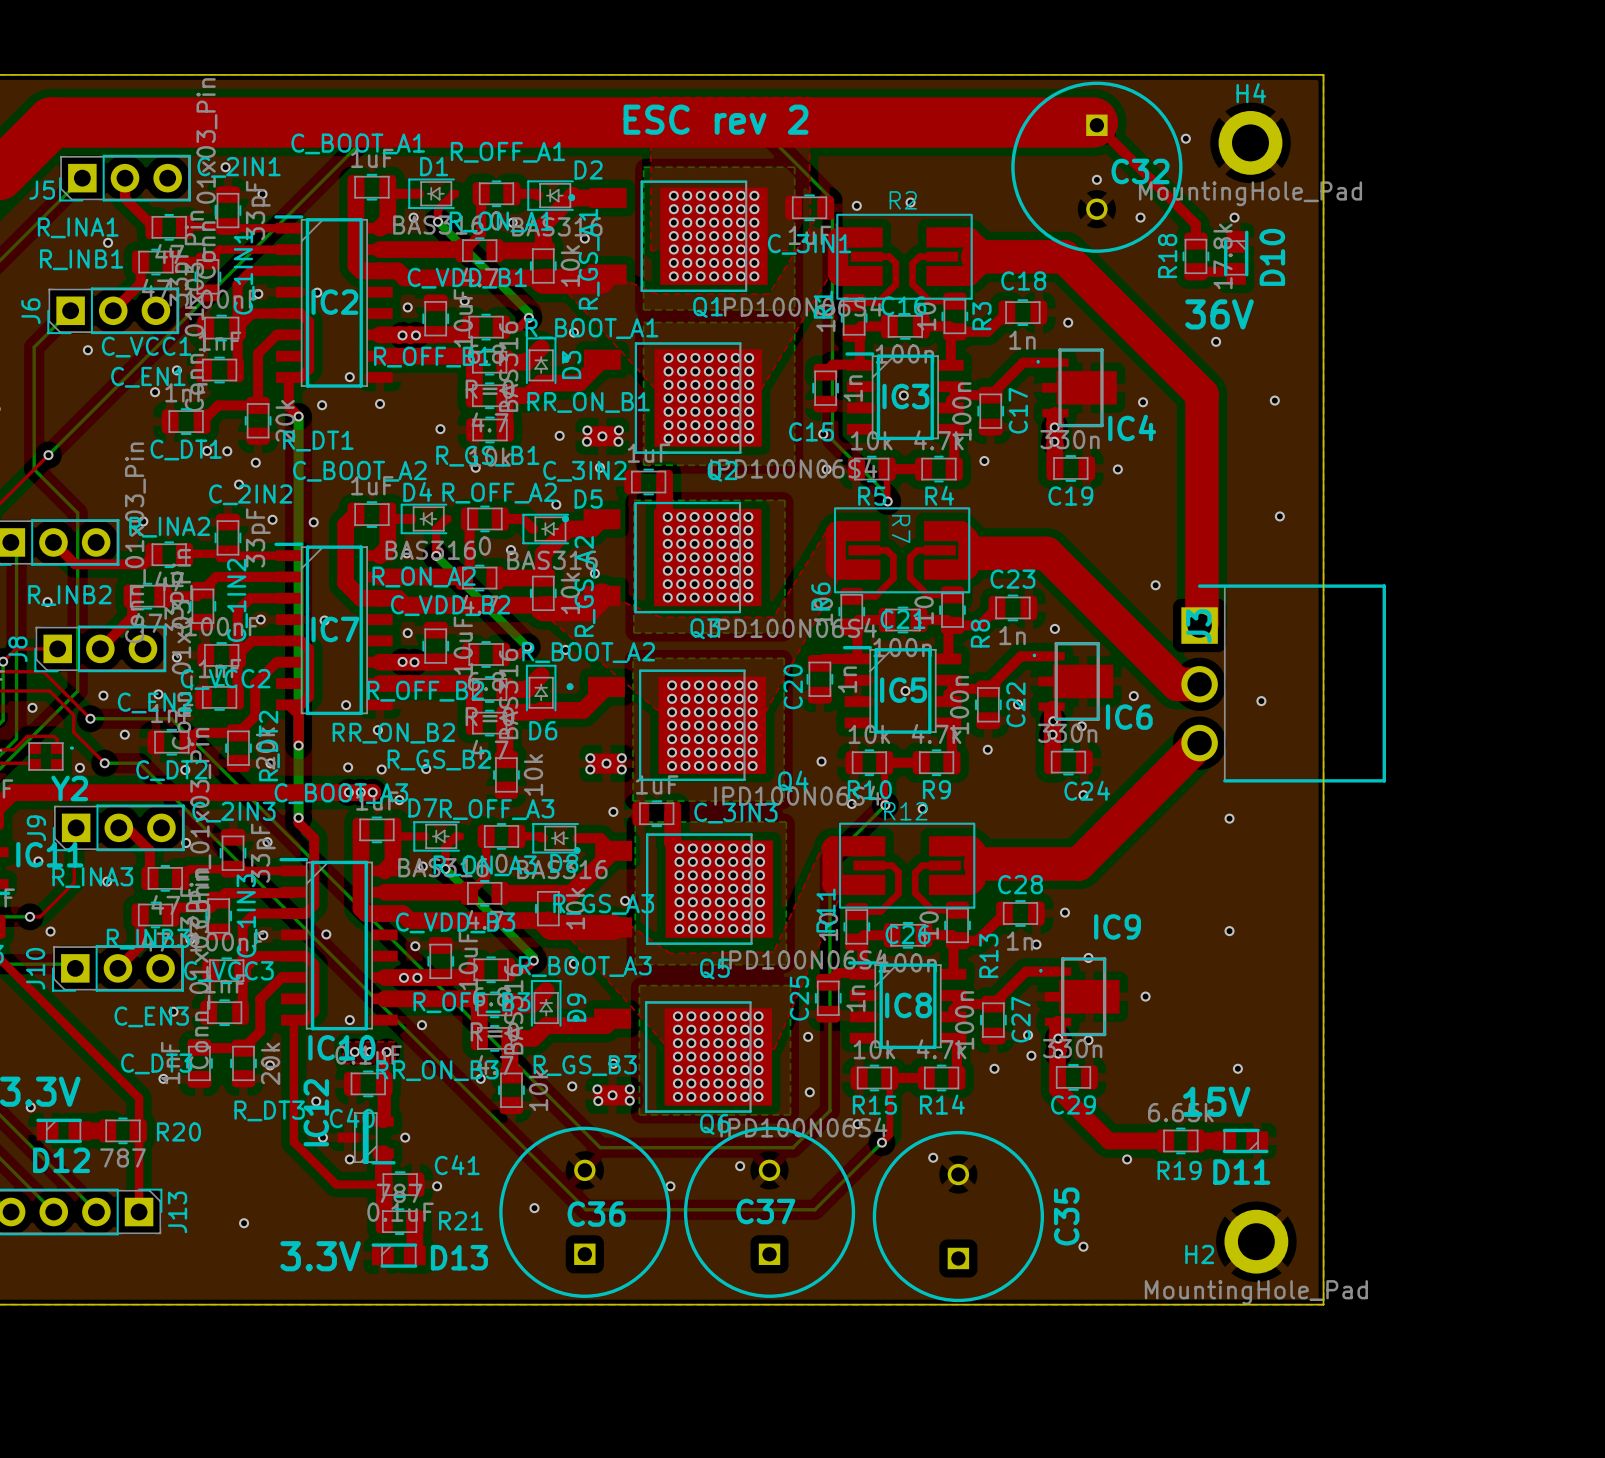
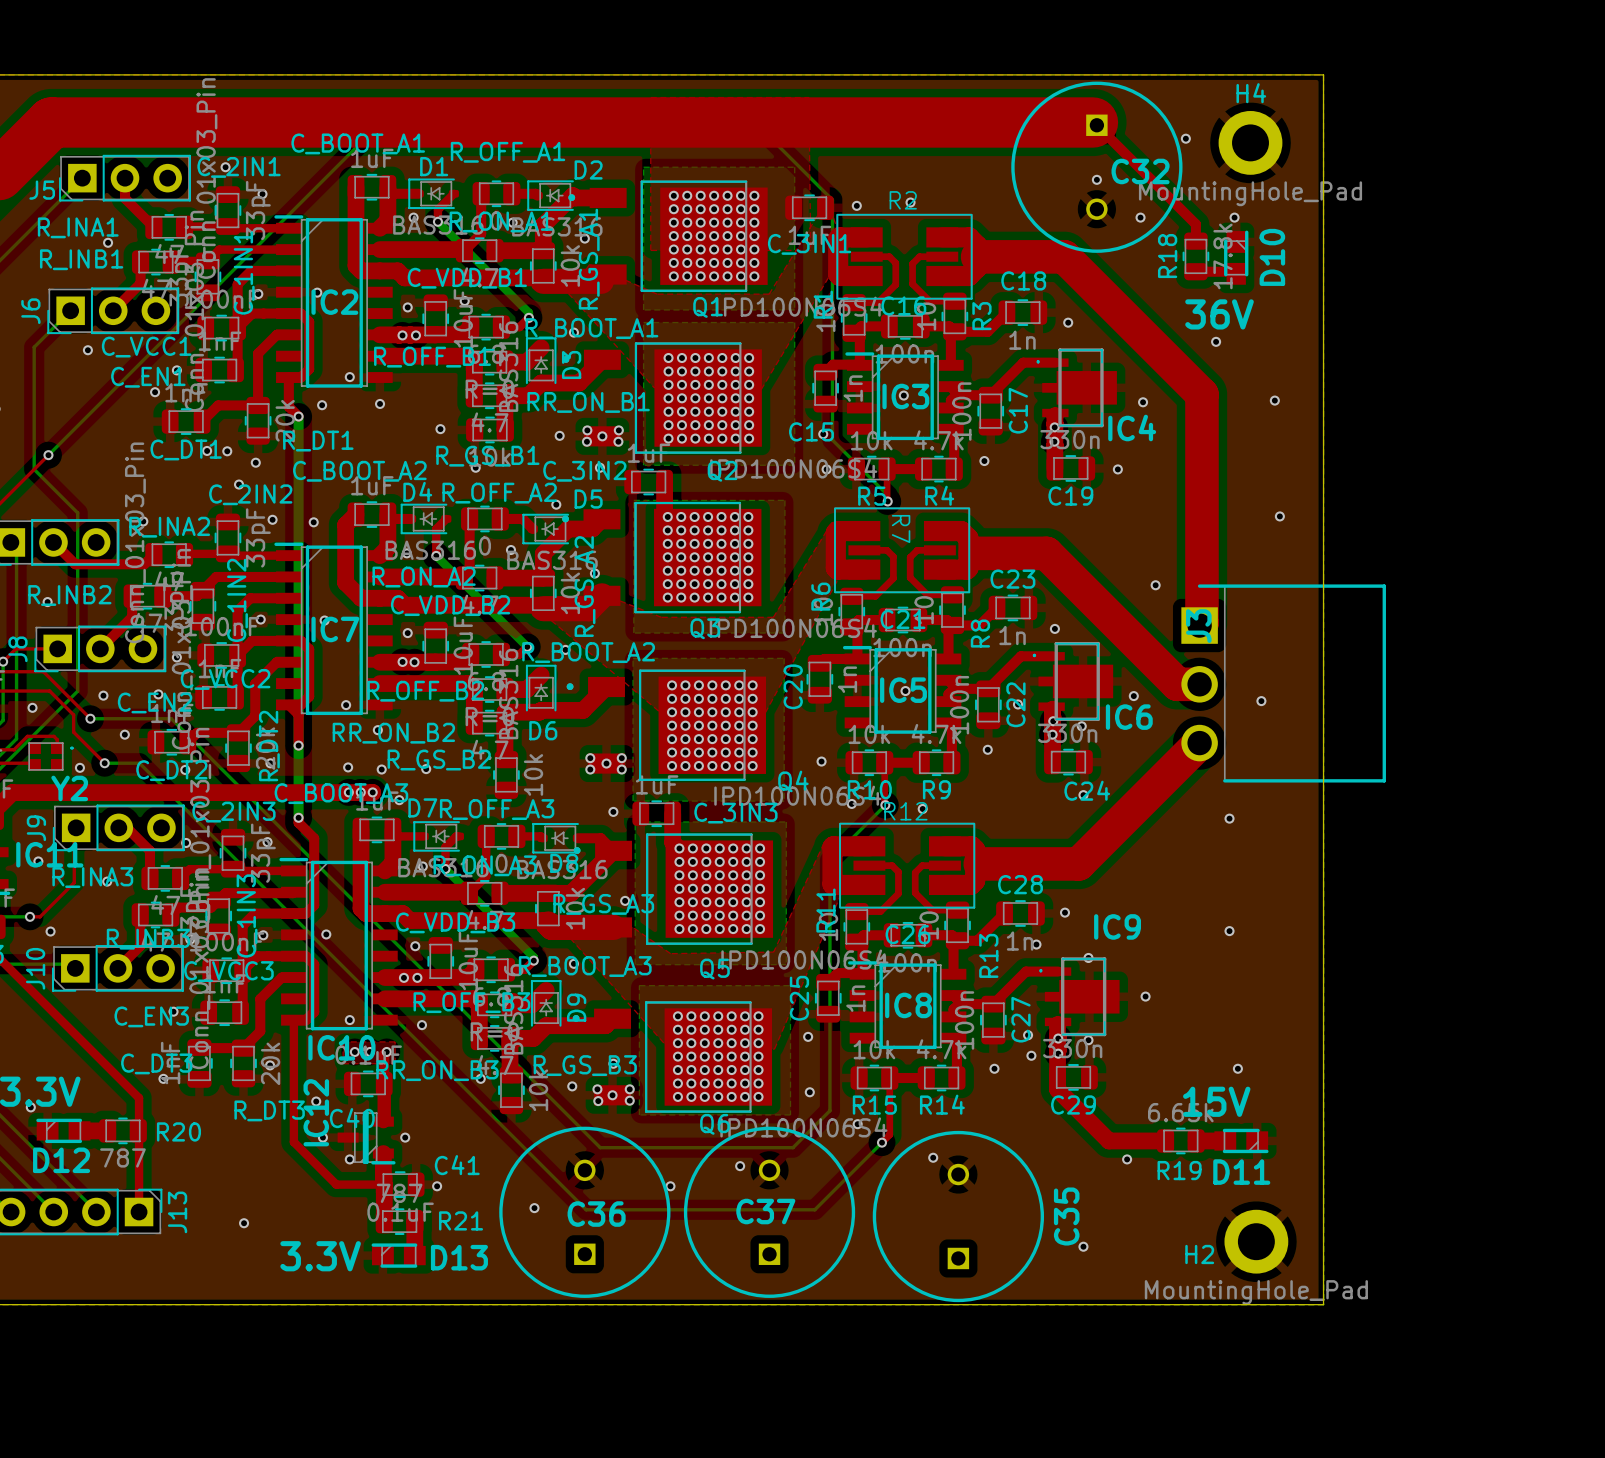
text: ESC rev 2 (715, 119) -> none

